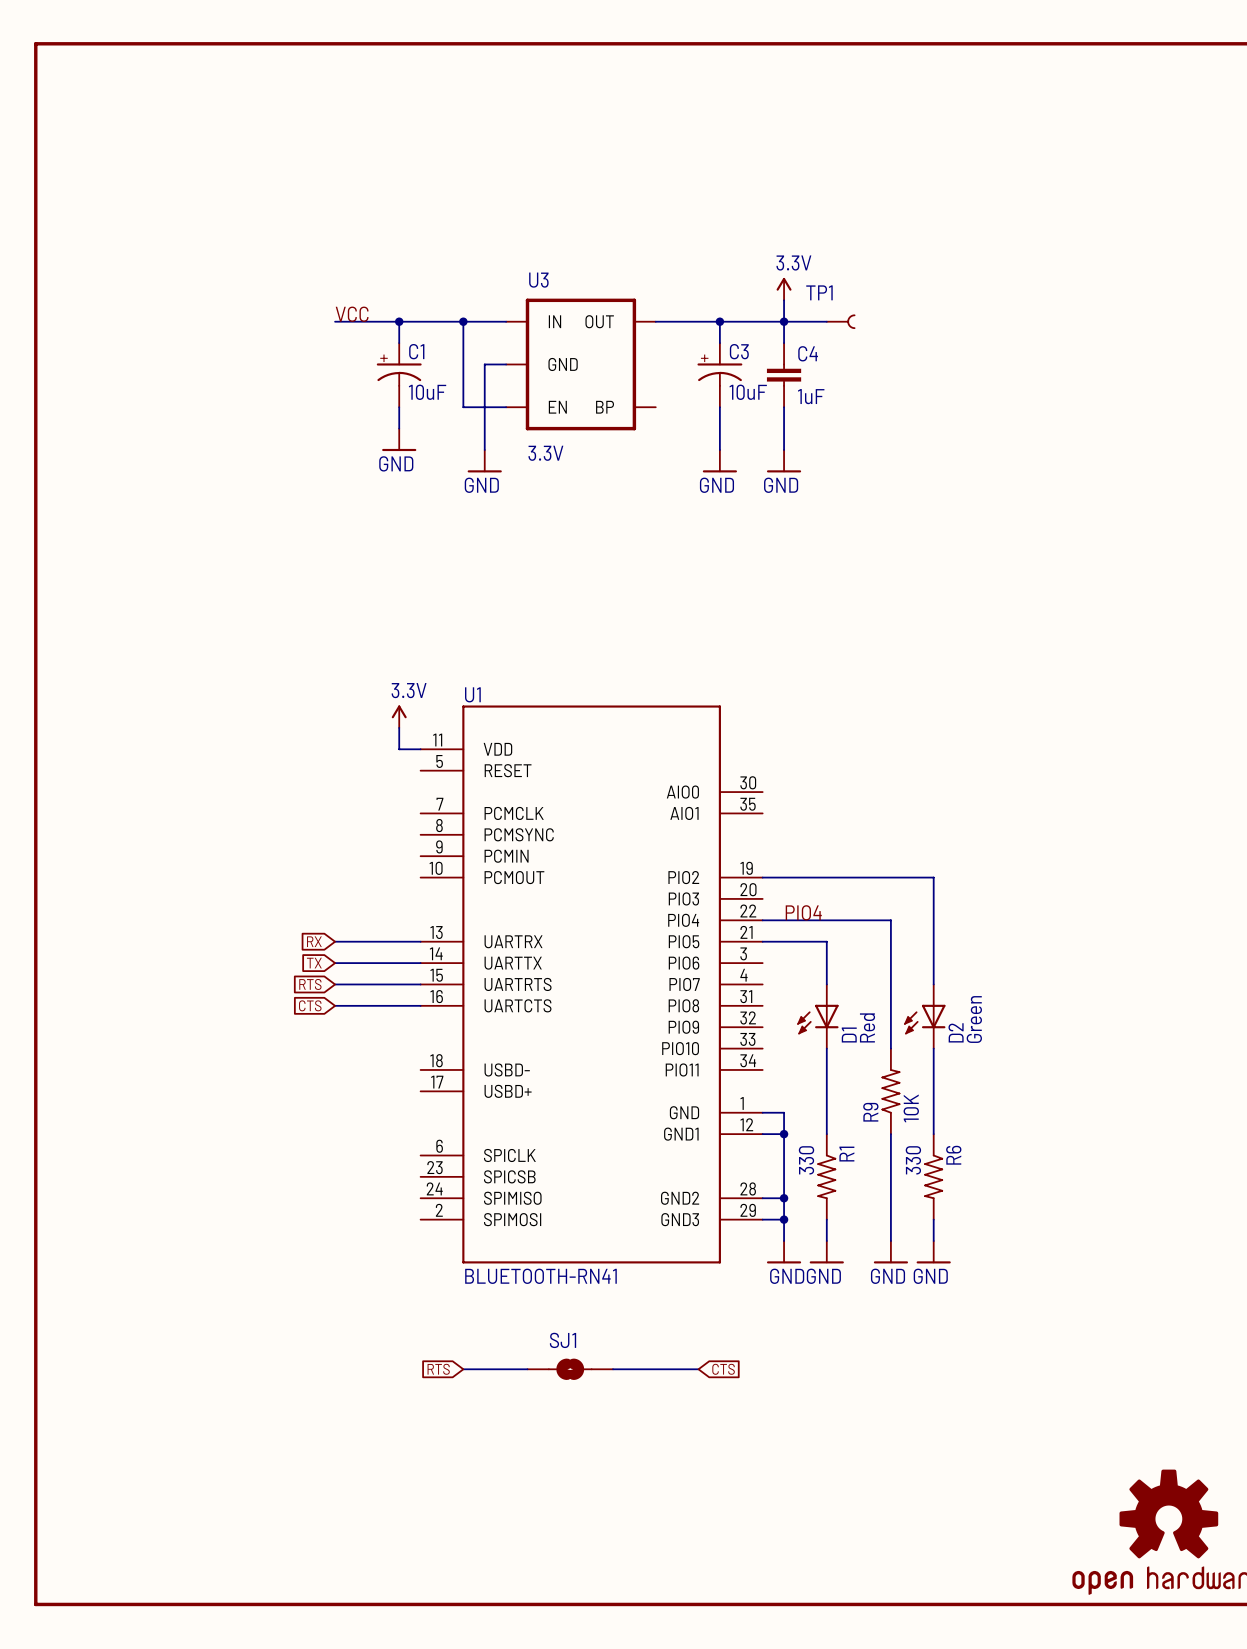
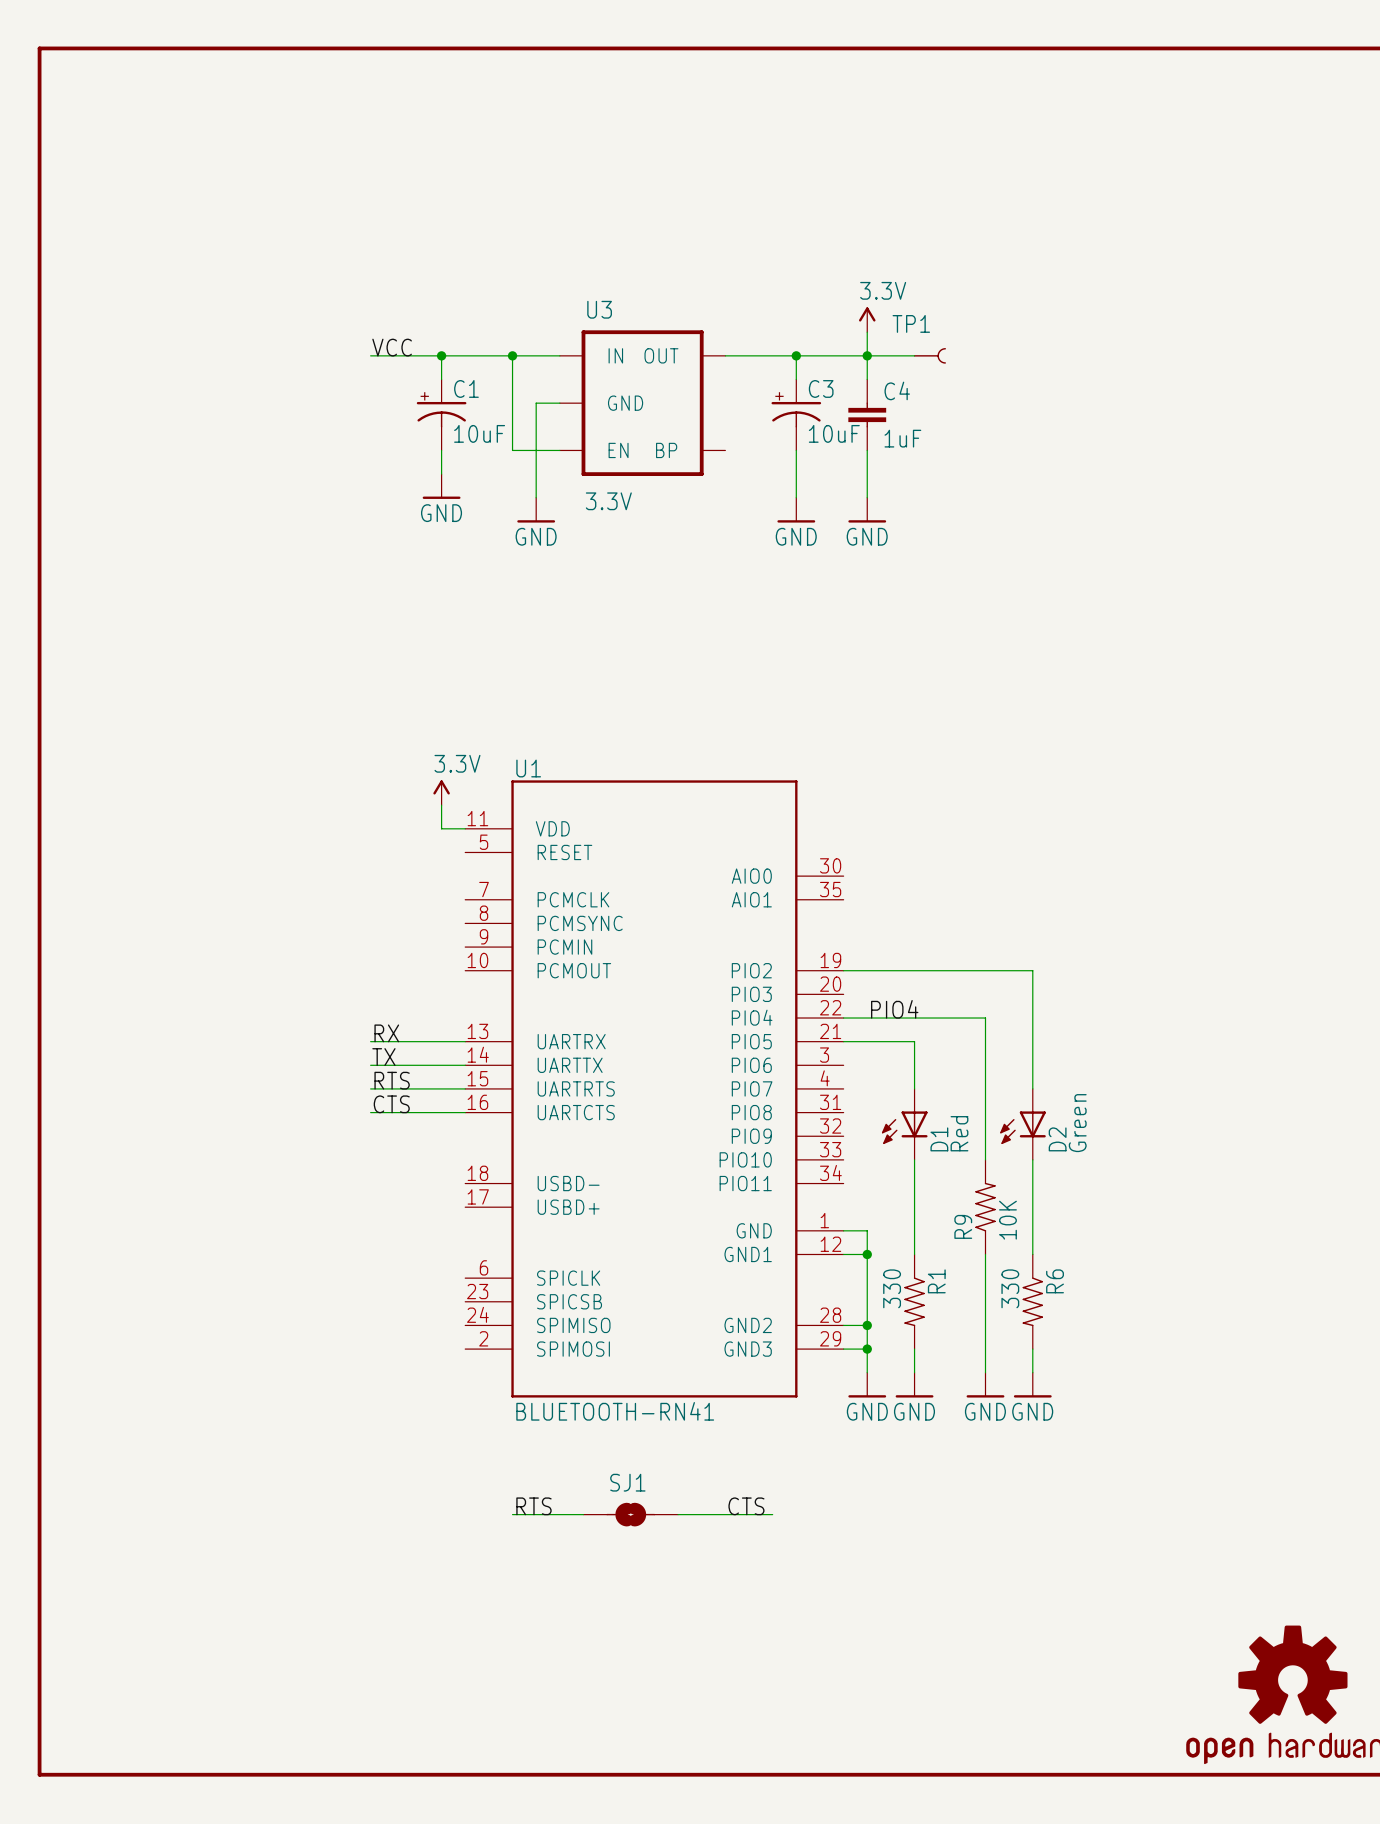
label: none -> RX (386, 1033)
global label: RX (314, 941) -> none
label: none -> TX (383, 1057)
global label: TX (314, 963) -> none
label: none -> RTS (392, 1080)
global label: RTS (310, 984) -> none
label: none -> CTS (391, 1104)
global label: CTS (310, 1005) -> none
label: none -> RTS (533, 1506)
label: none -> CTS (746, 1506)
global label: RTS (438, 1369) -> none
global label: CTS (723, 1369) -> none

